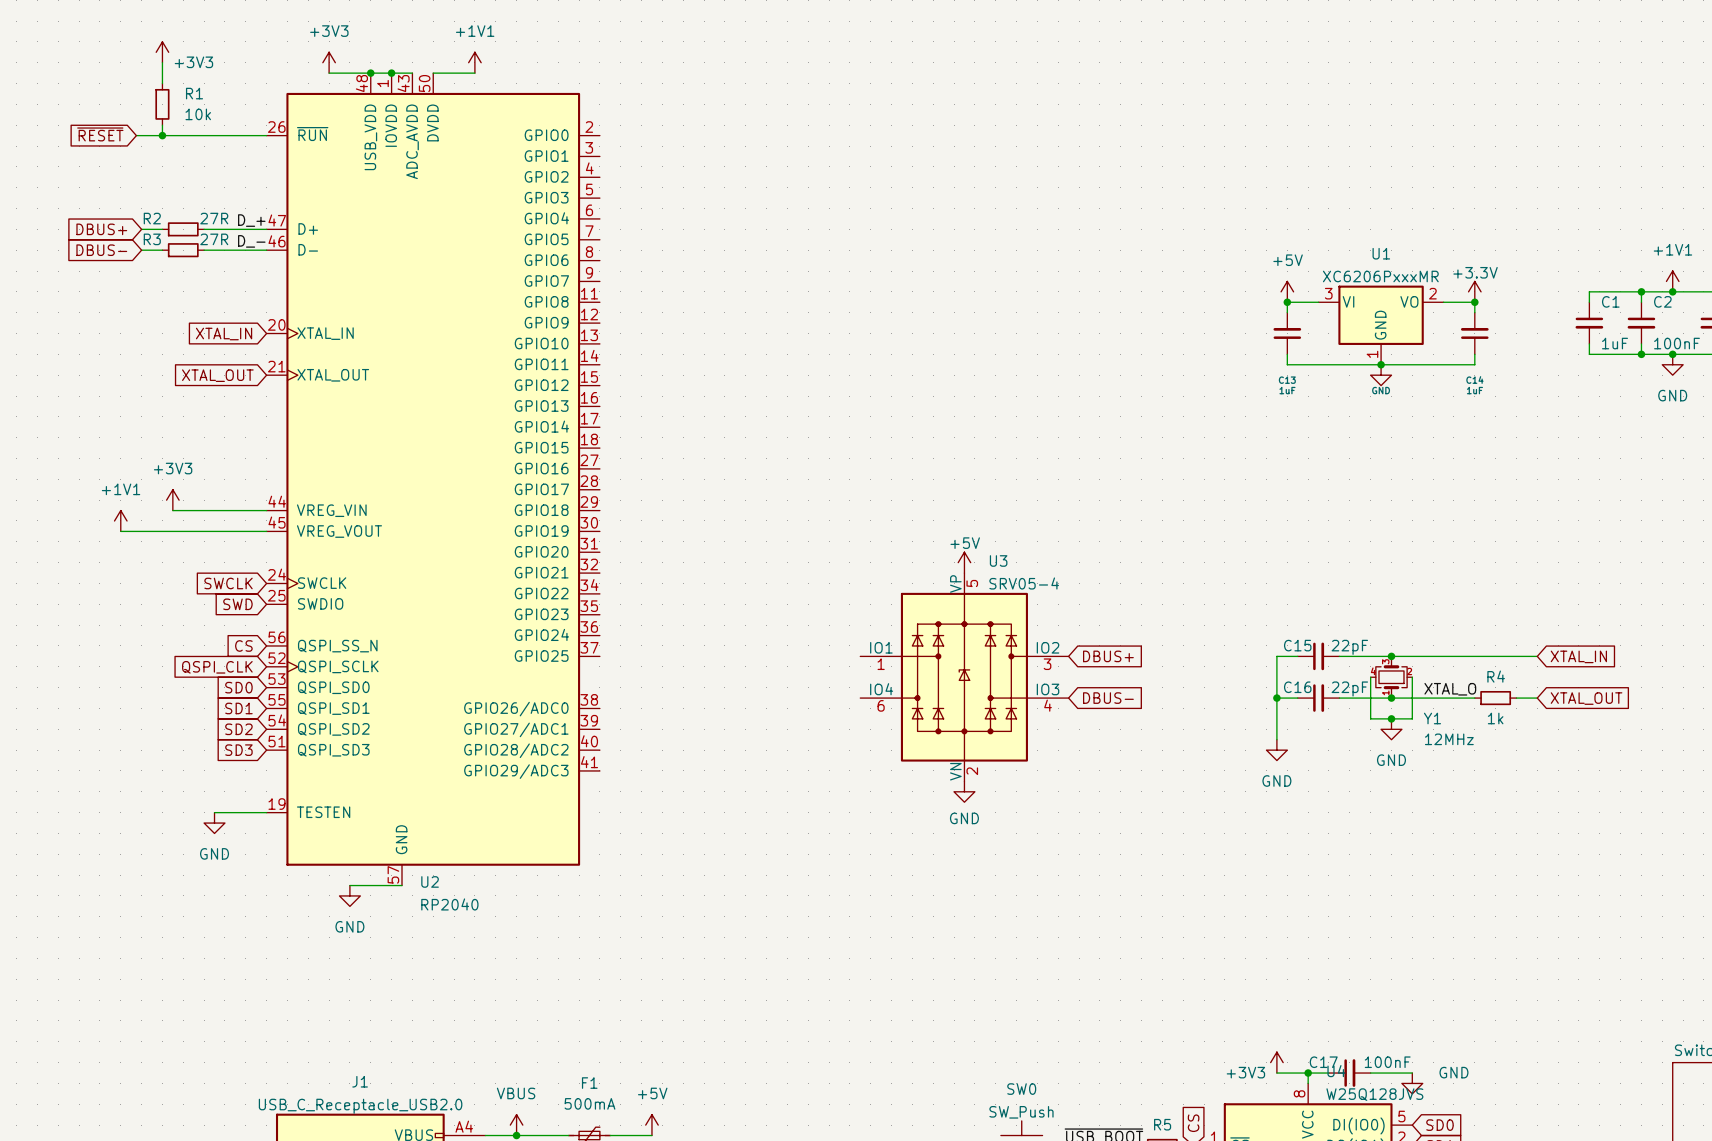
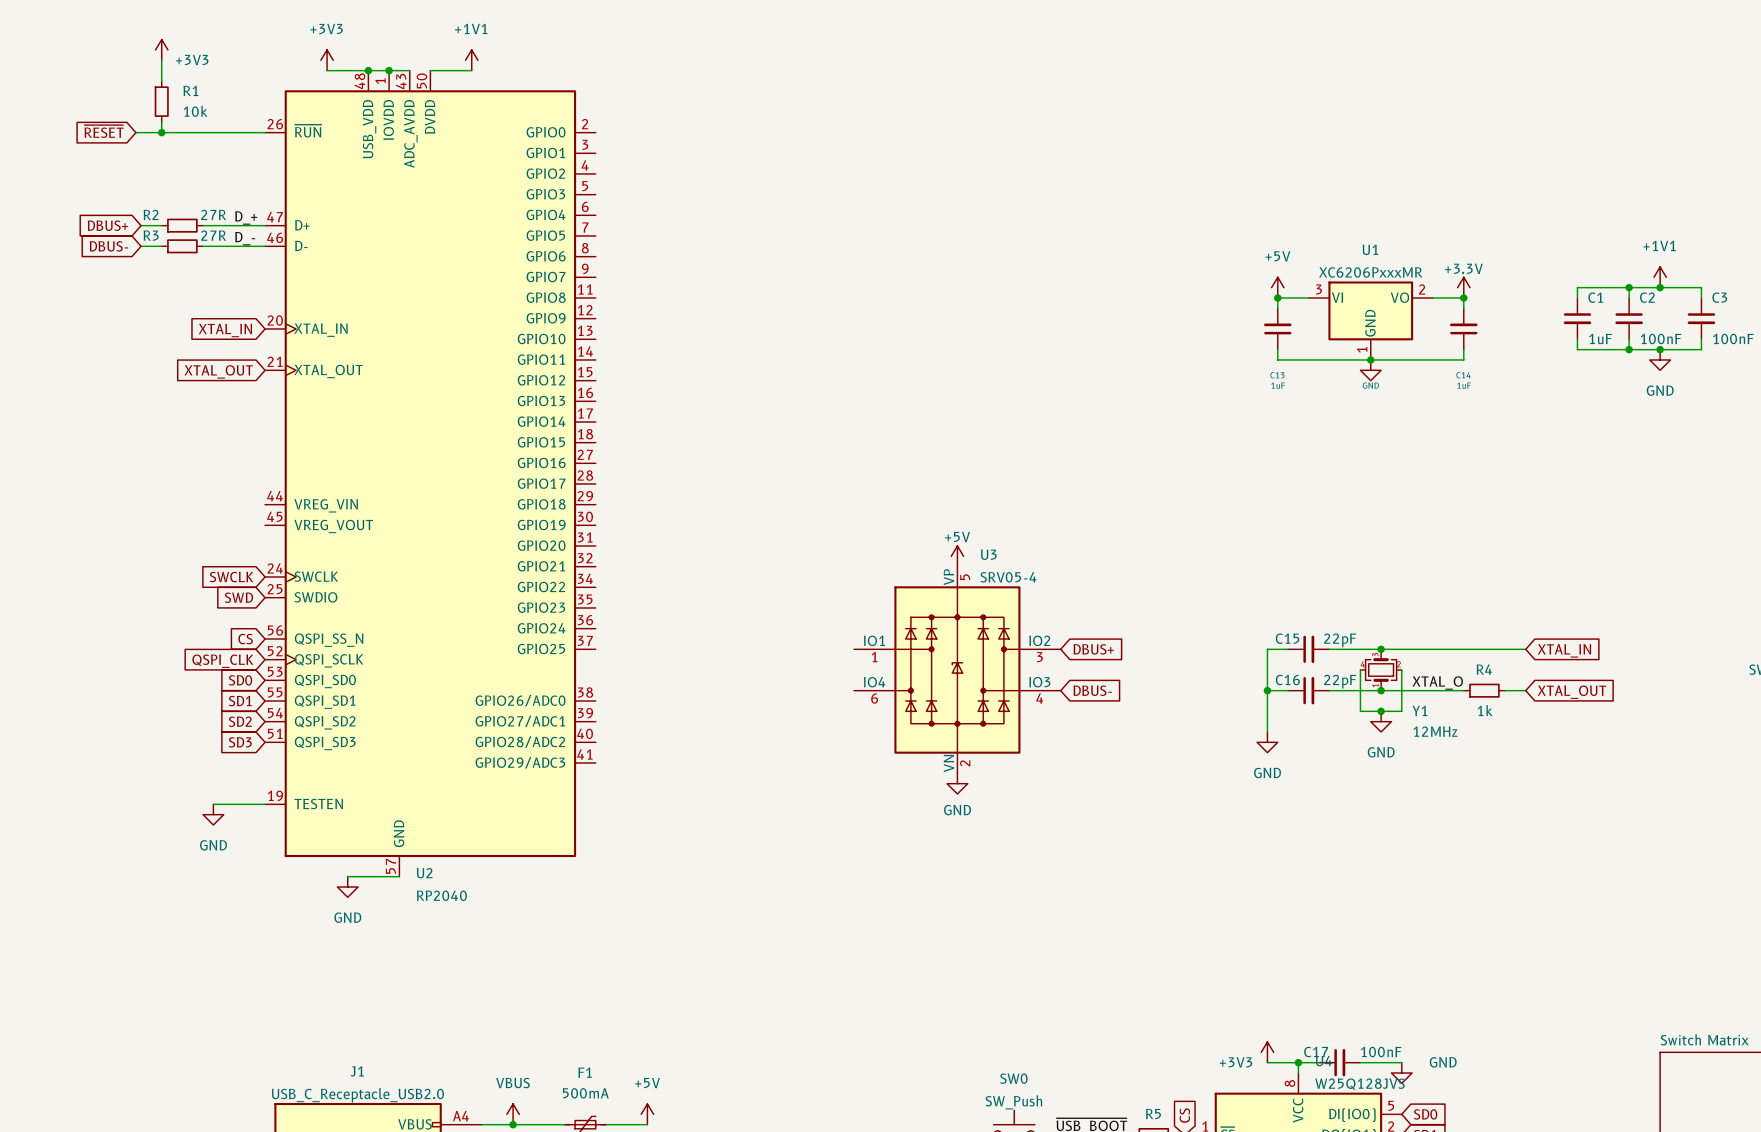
power symbol: +3V3 (172, 500) -> none
wire: (172, 510) (266, 510) -> none
power symbol: +1V1 (120, 520) -> none
wire: (120, 531) (266, 531) -> none

